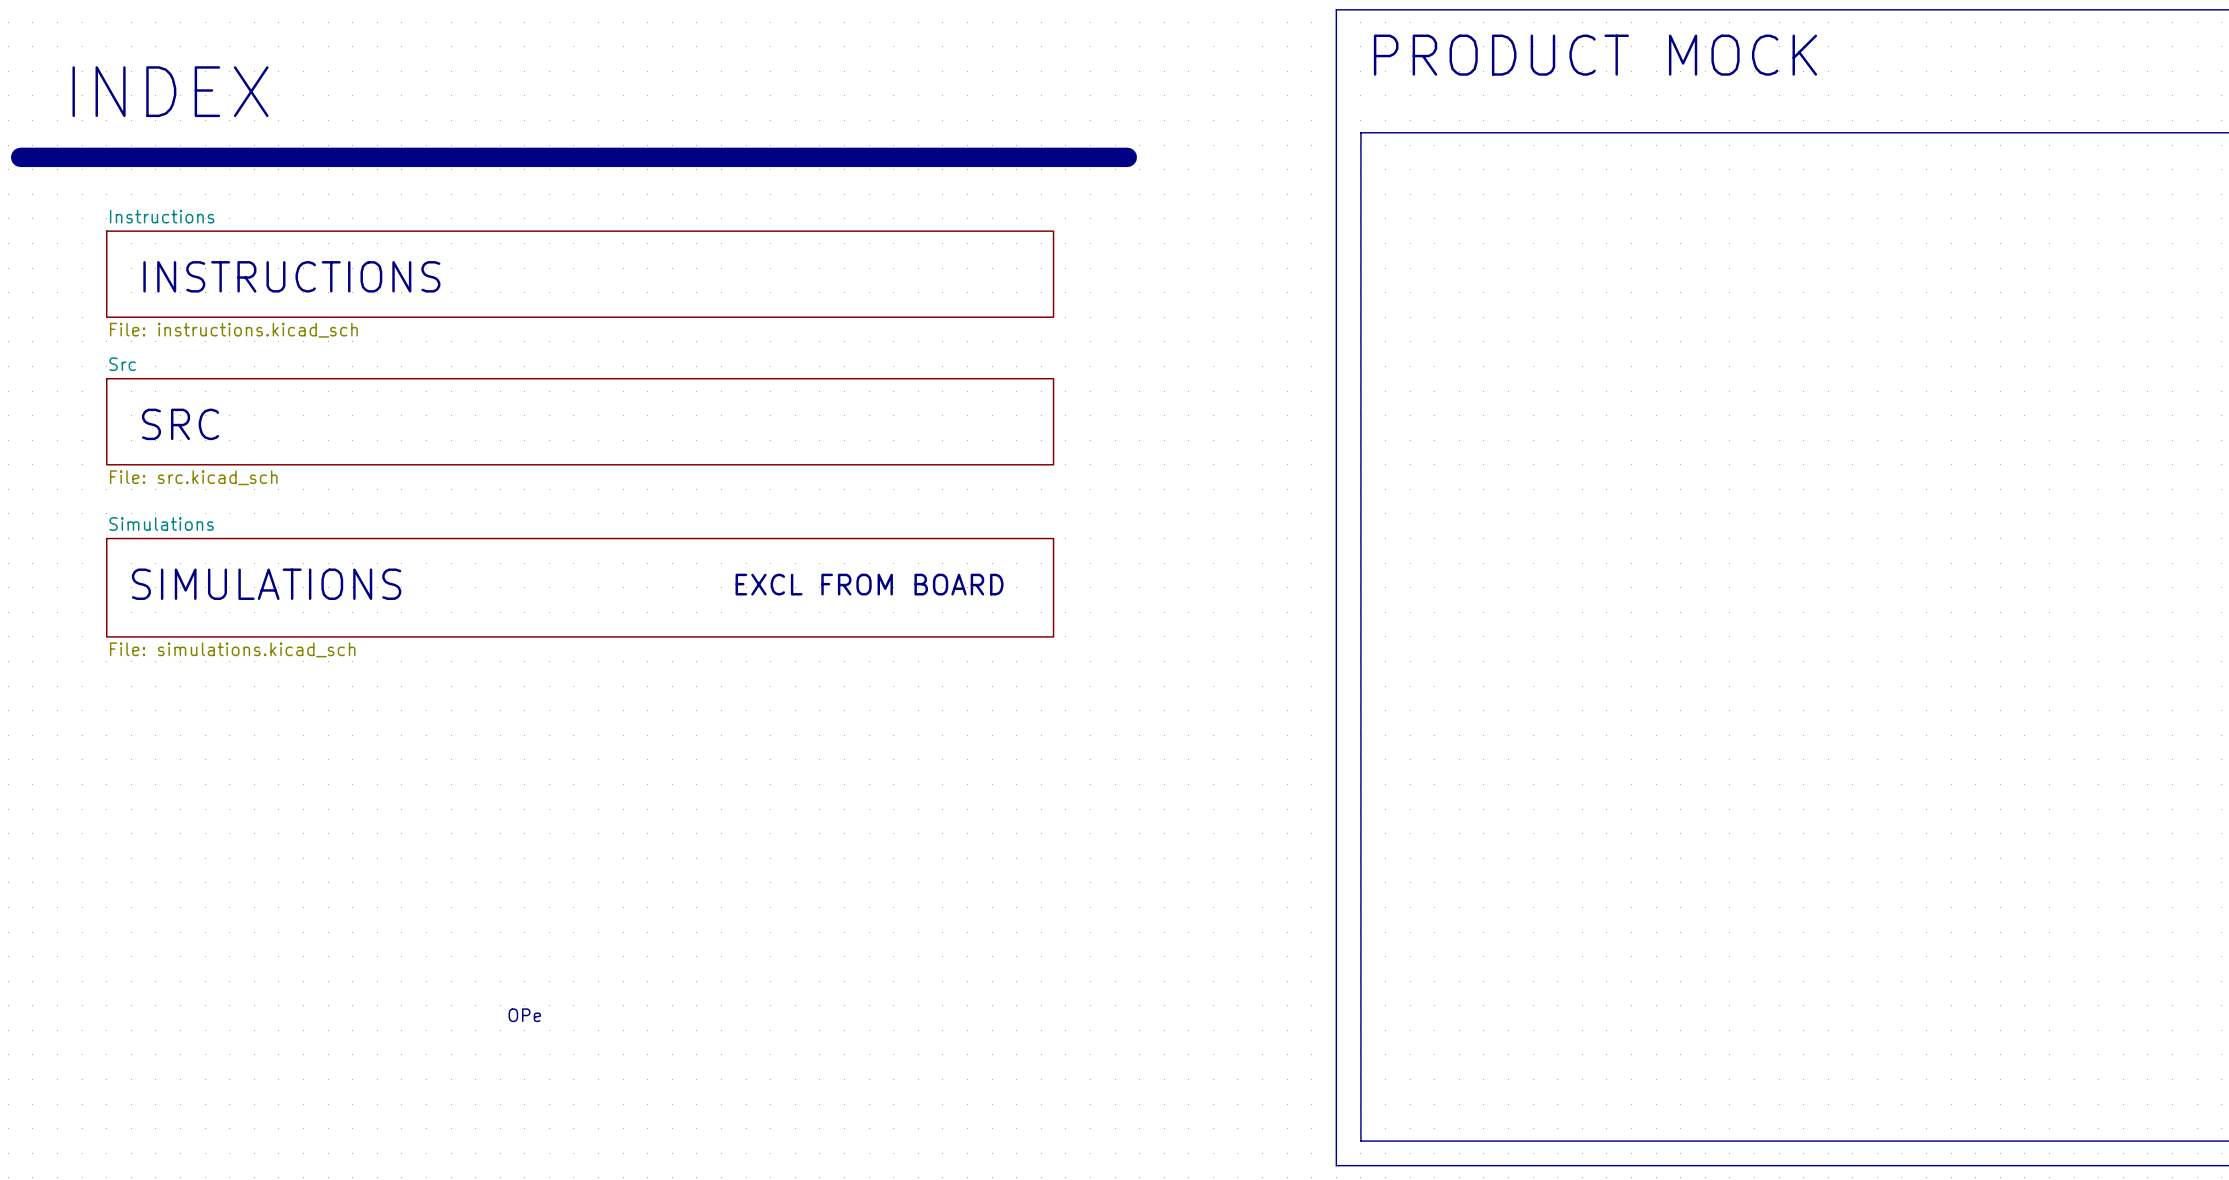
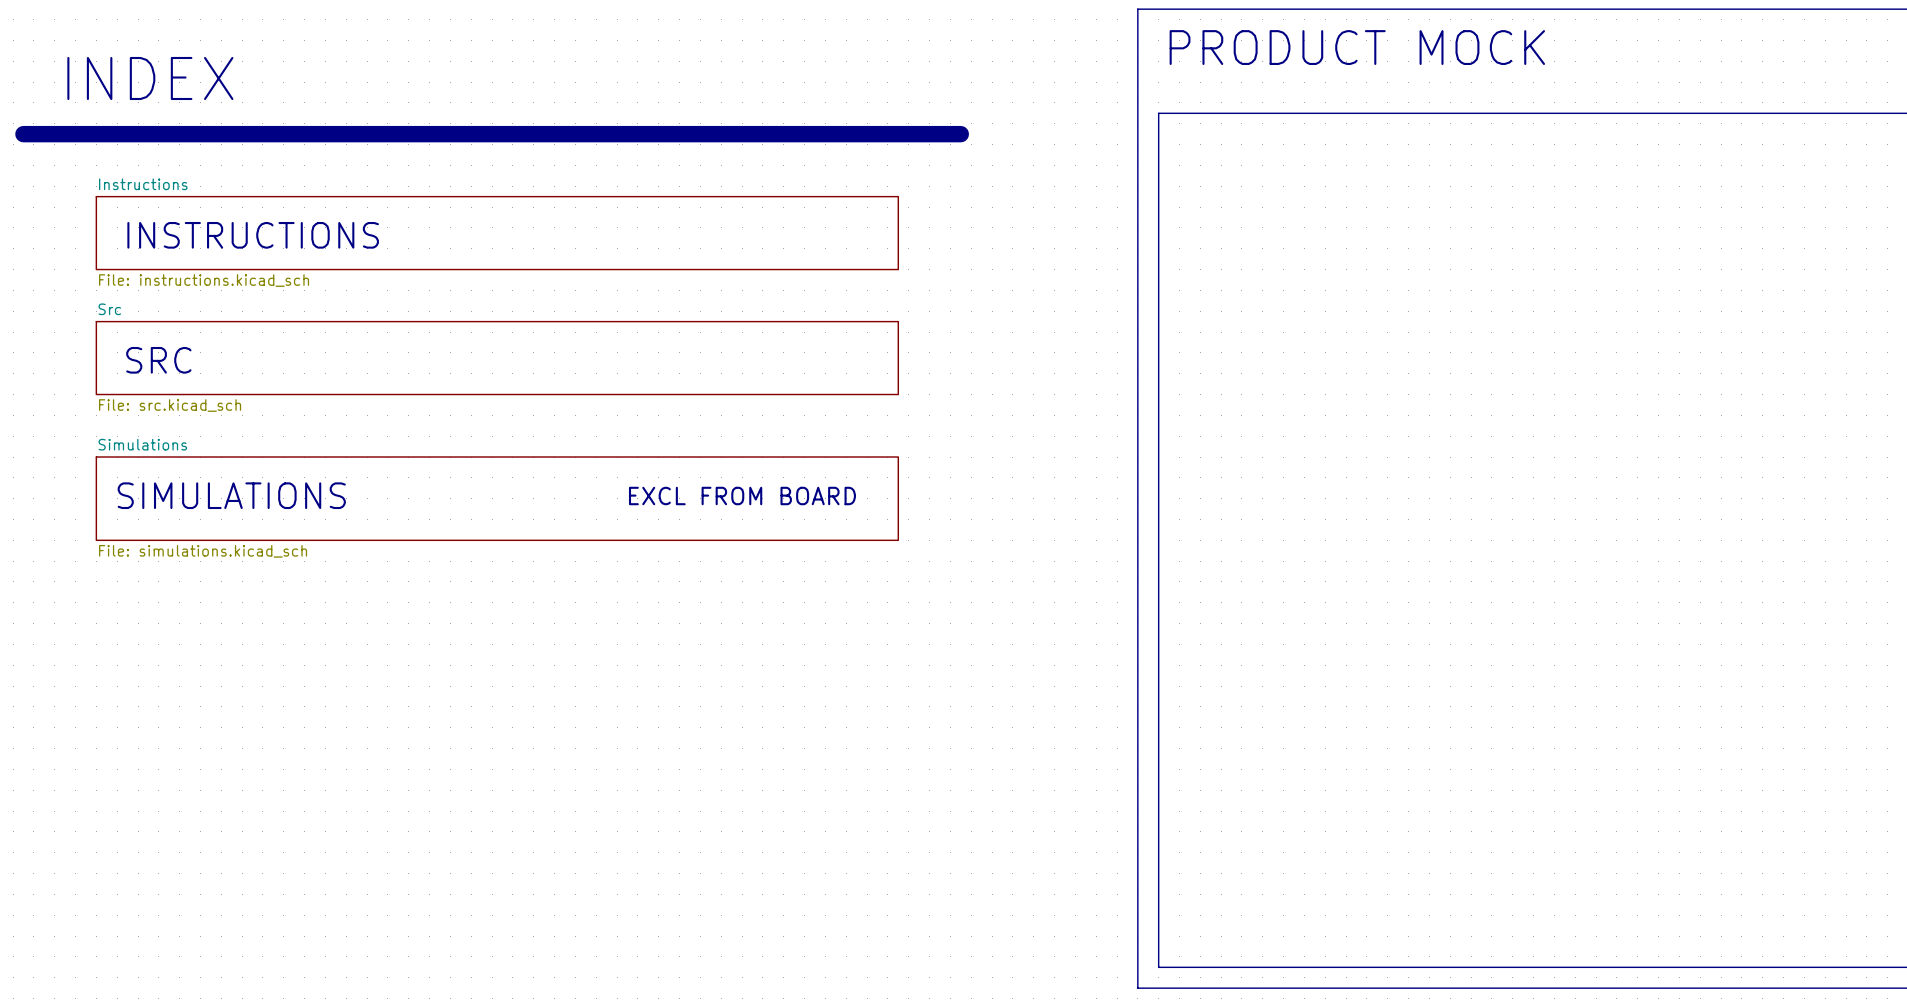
text: OPe (524, 1015) -> none

